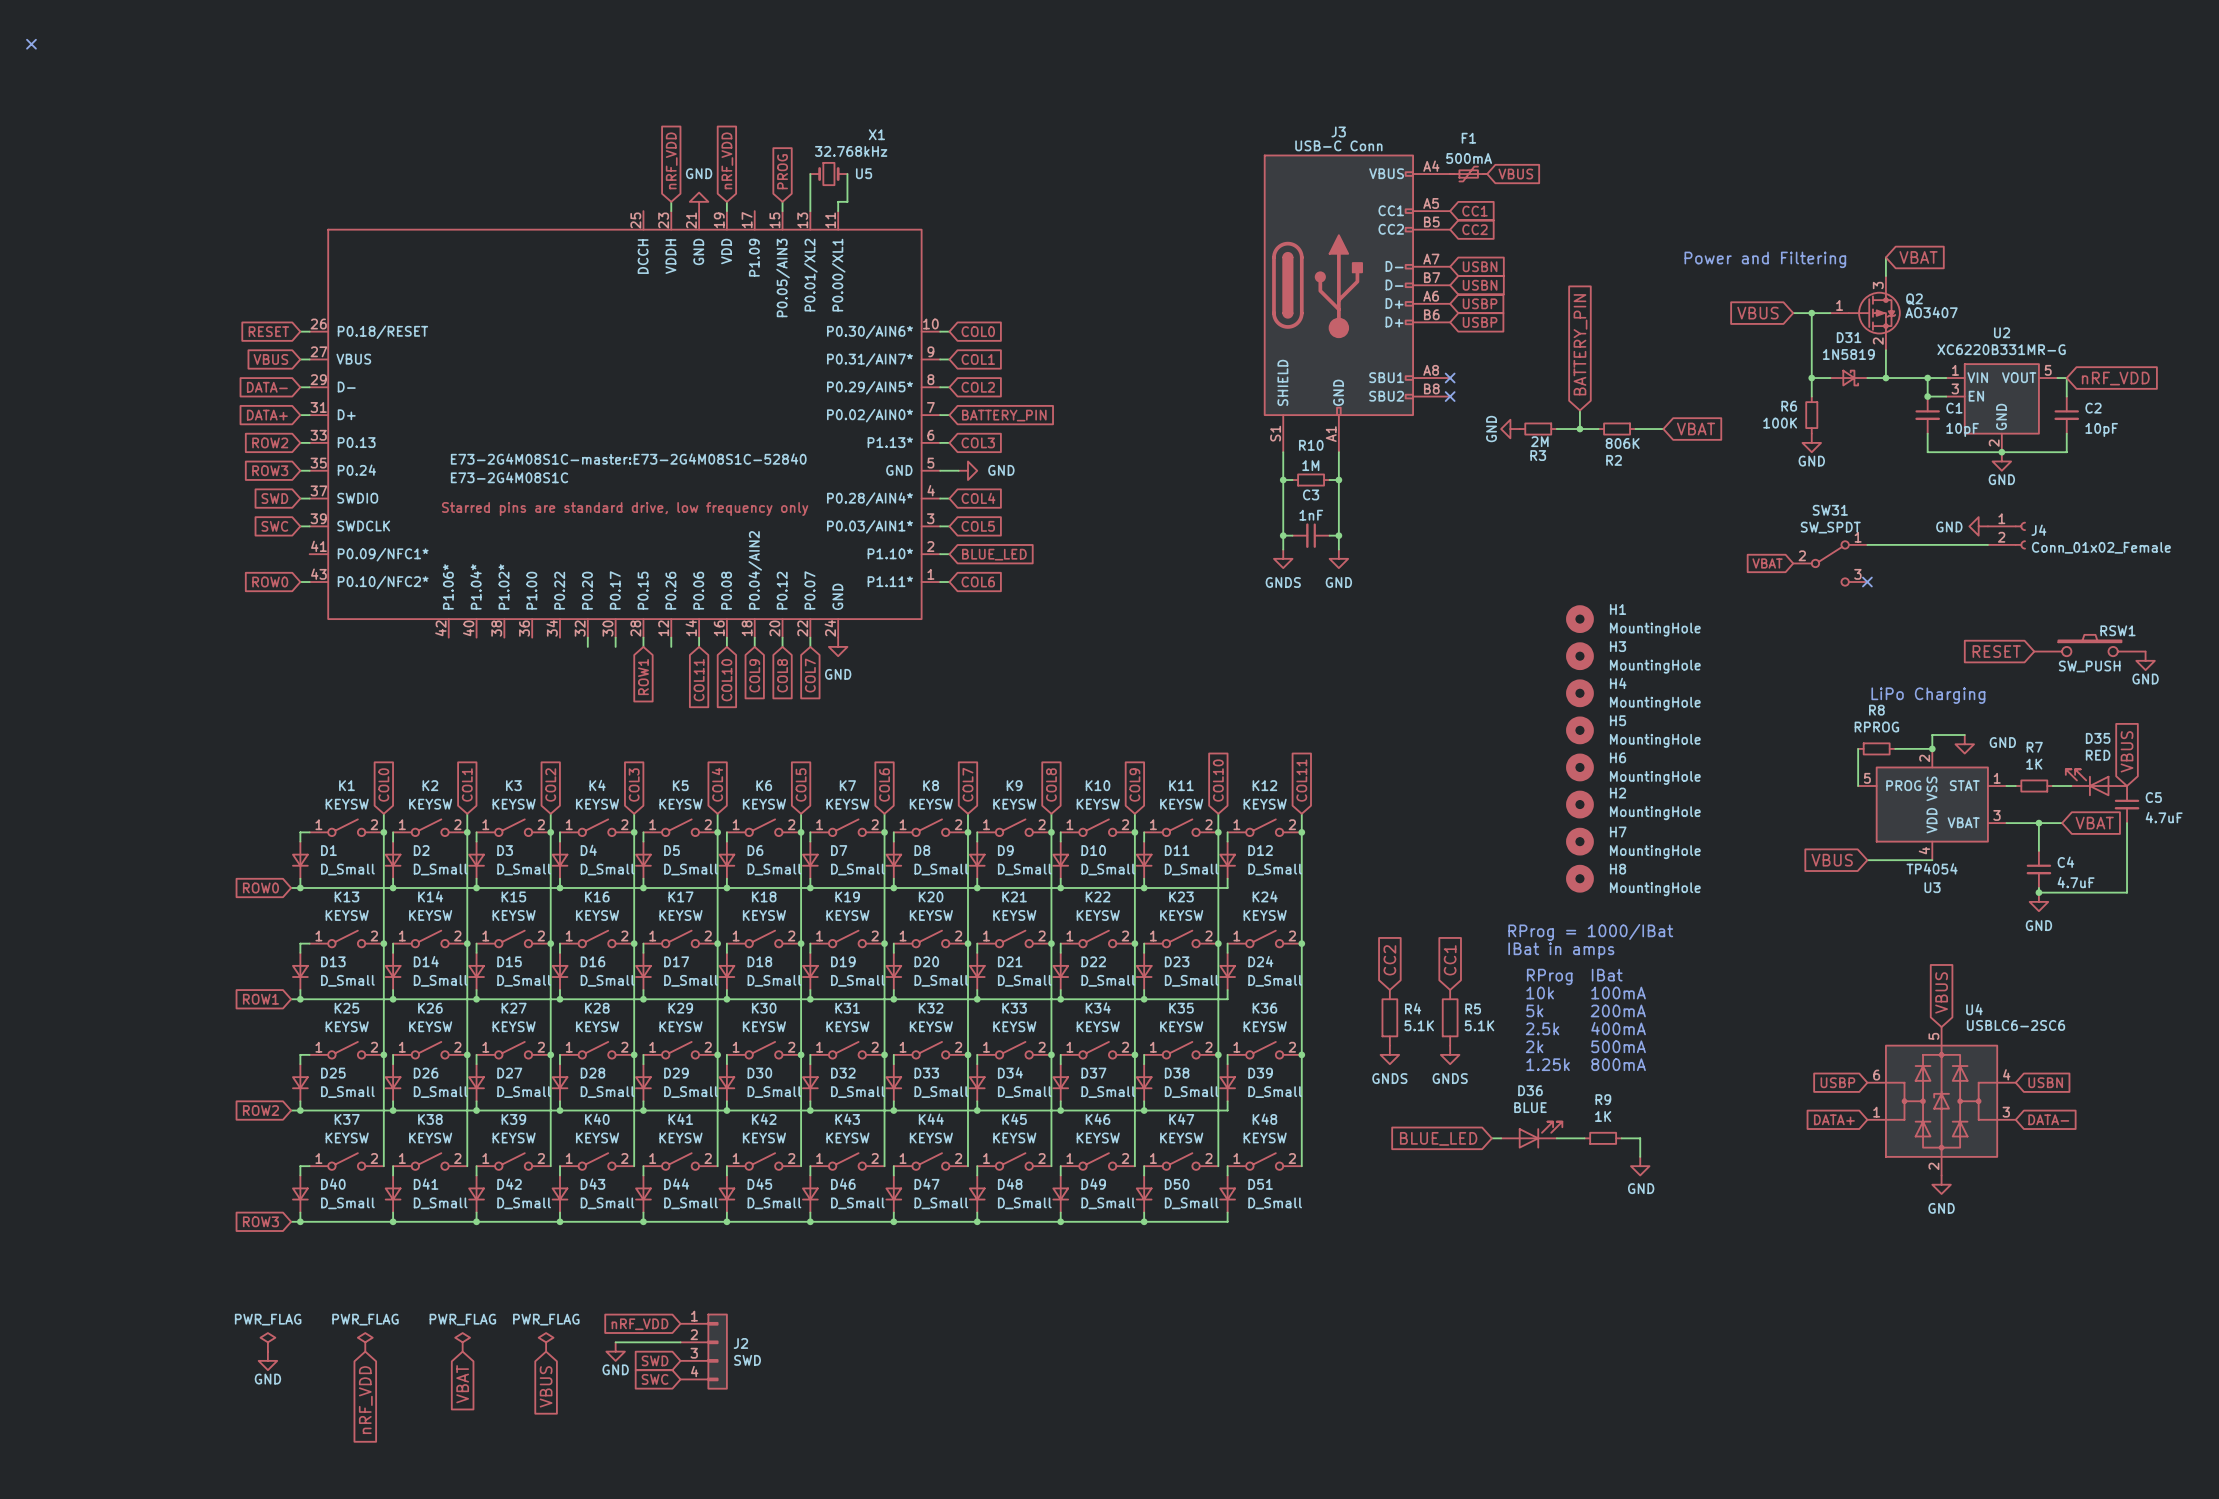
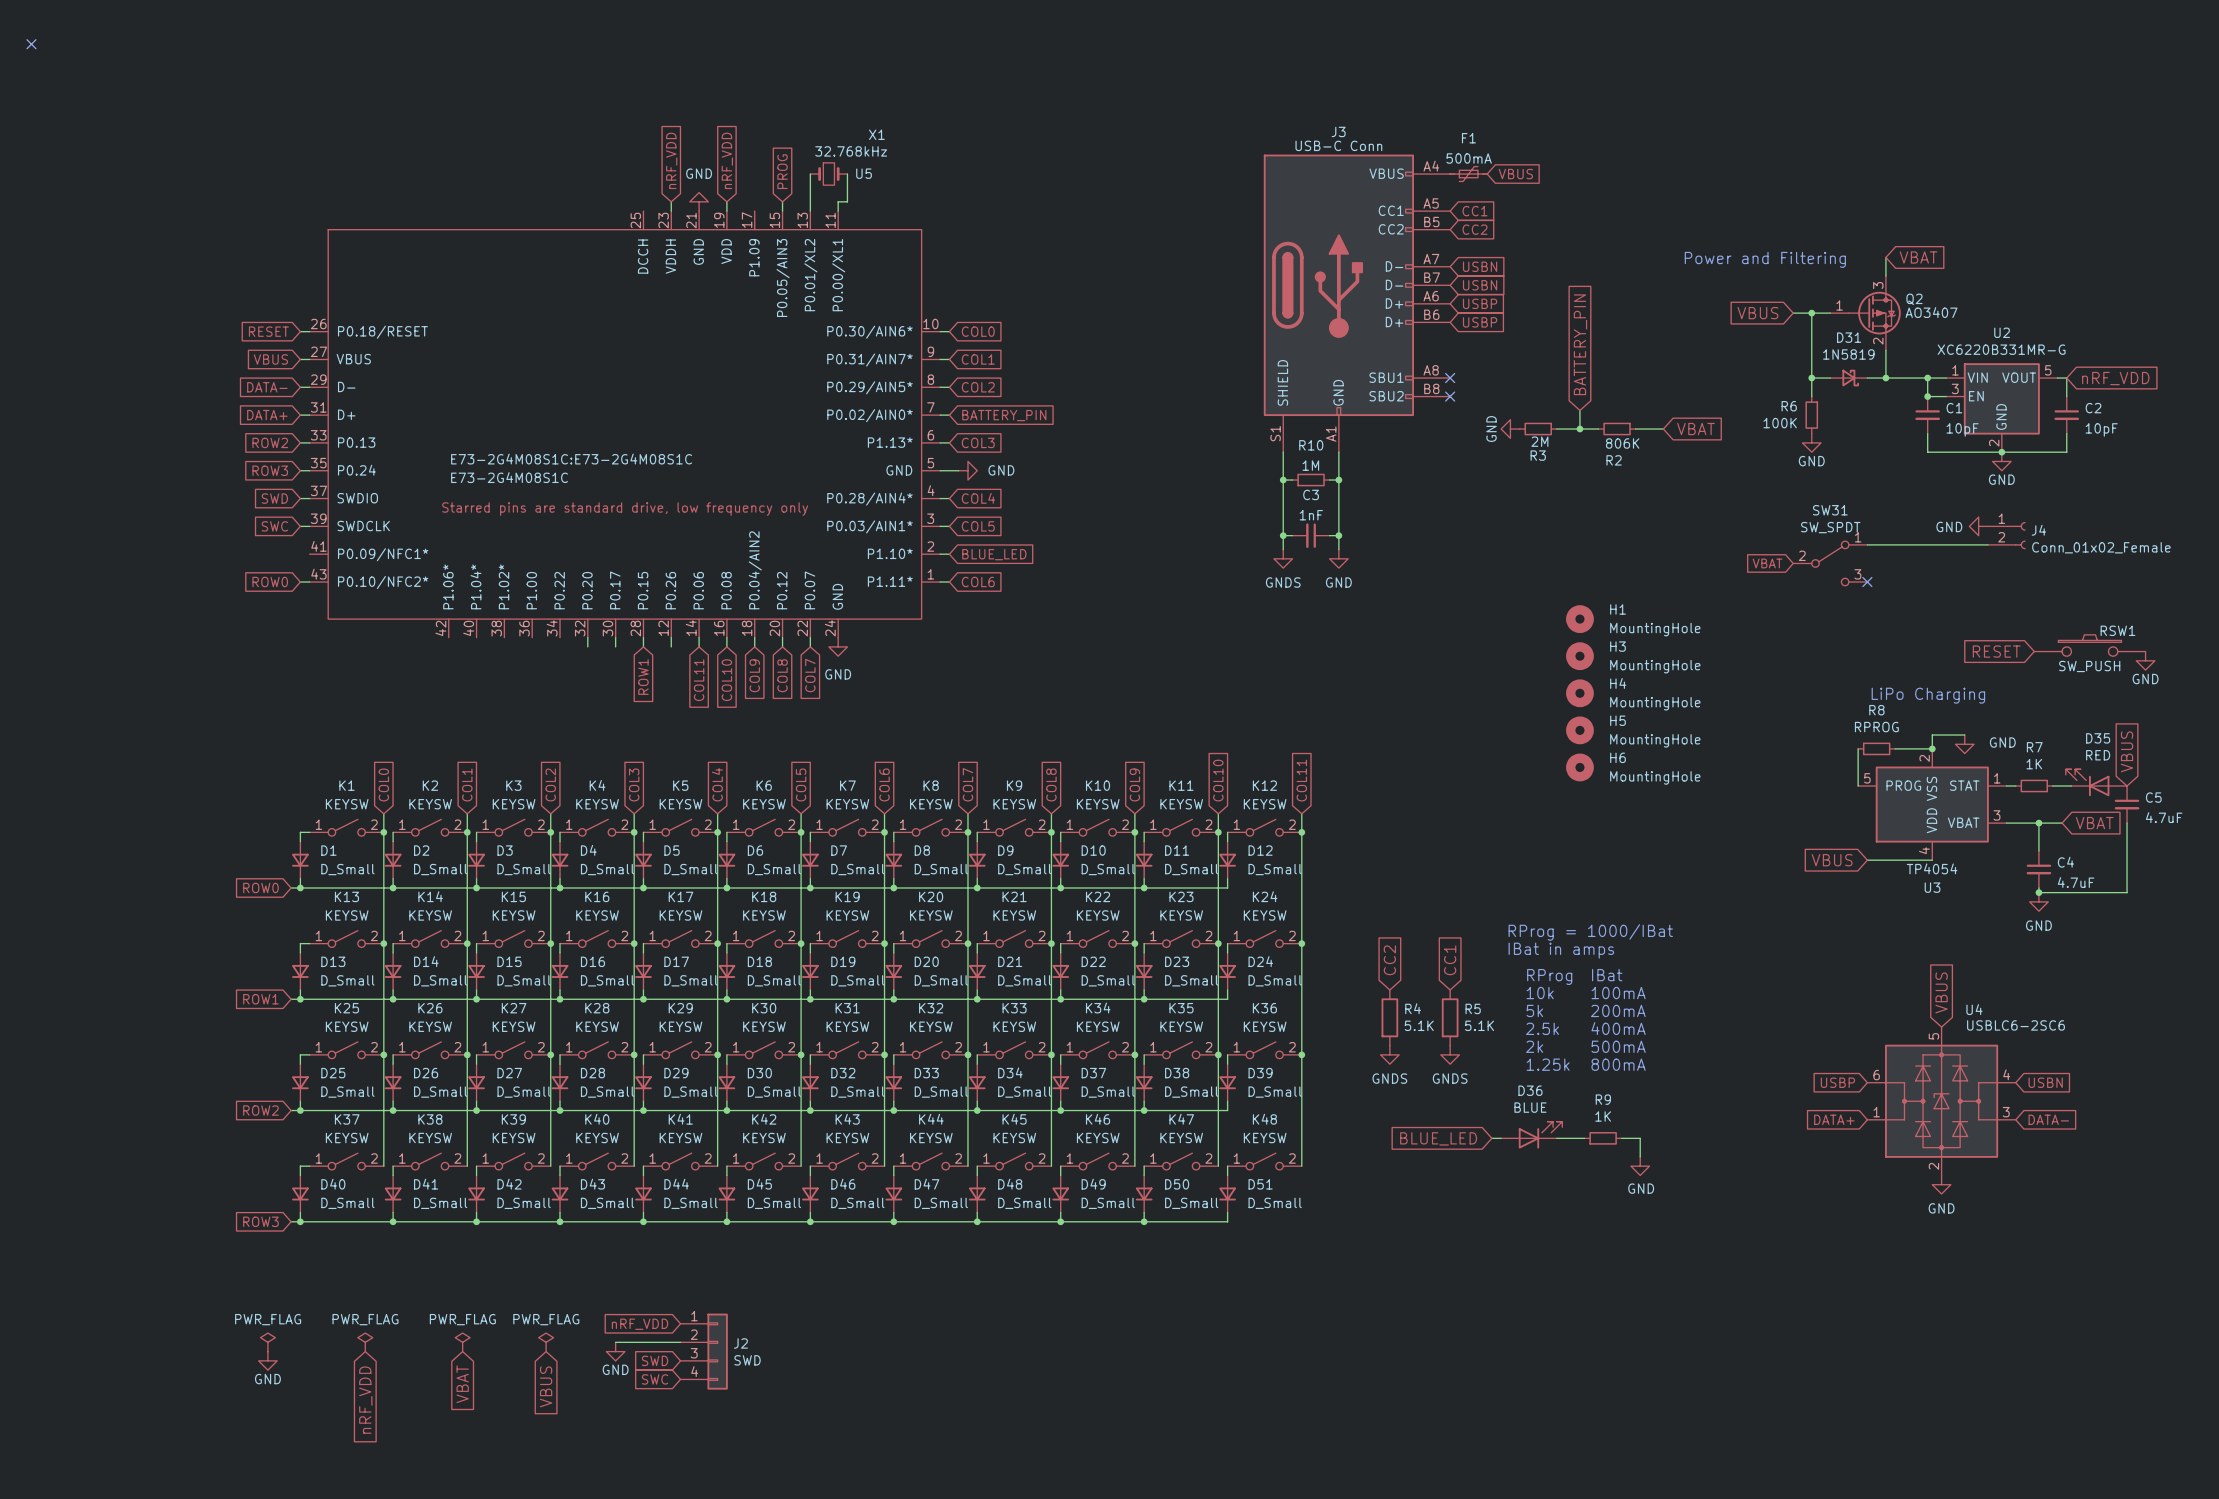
U5 text: E73-2G4M08S1C-master:E73-2G4M08S1C-52840 (628, 459) -> E73-2G4M08S1C:E73-2G4M08S1C (571, 459)
H2: MountingHole (1579, 804) -> none
H7: MountingHole (1579, 841) -> none
H8: MountingHole (1579, 878) -> none

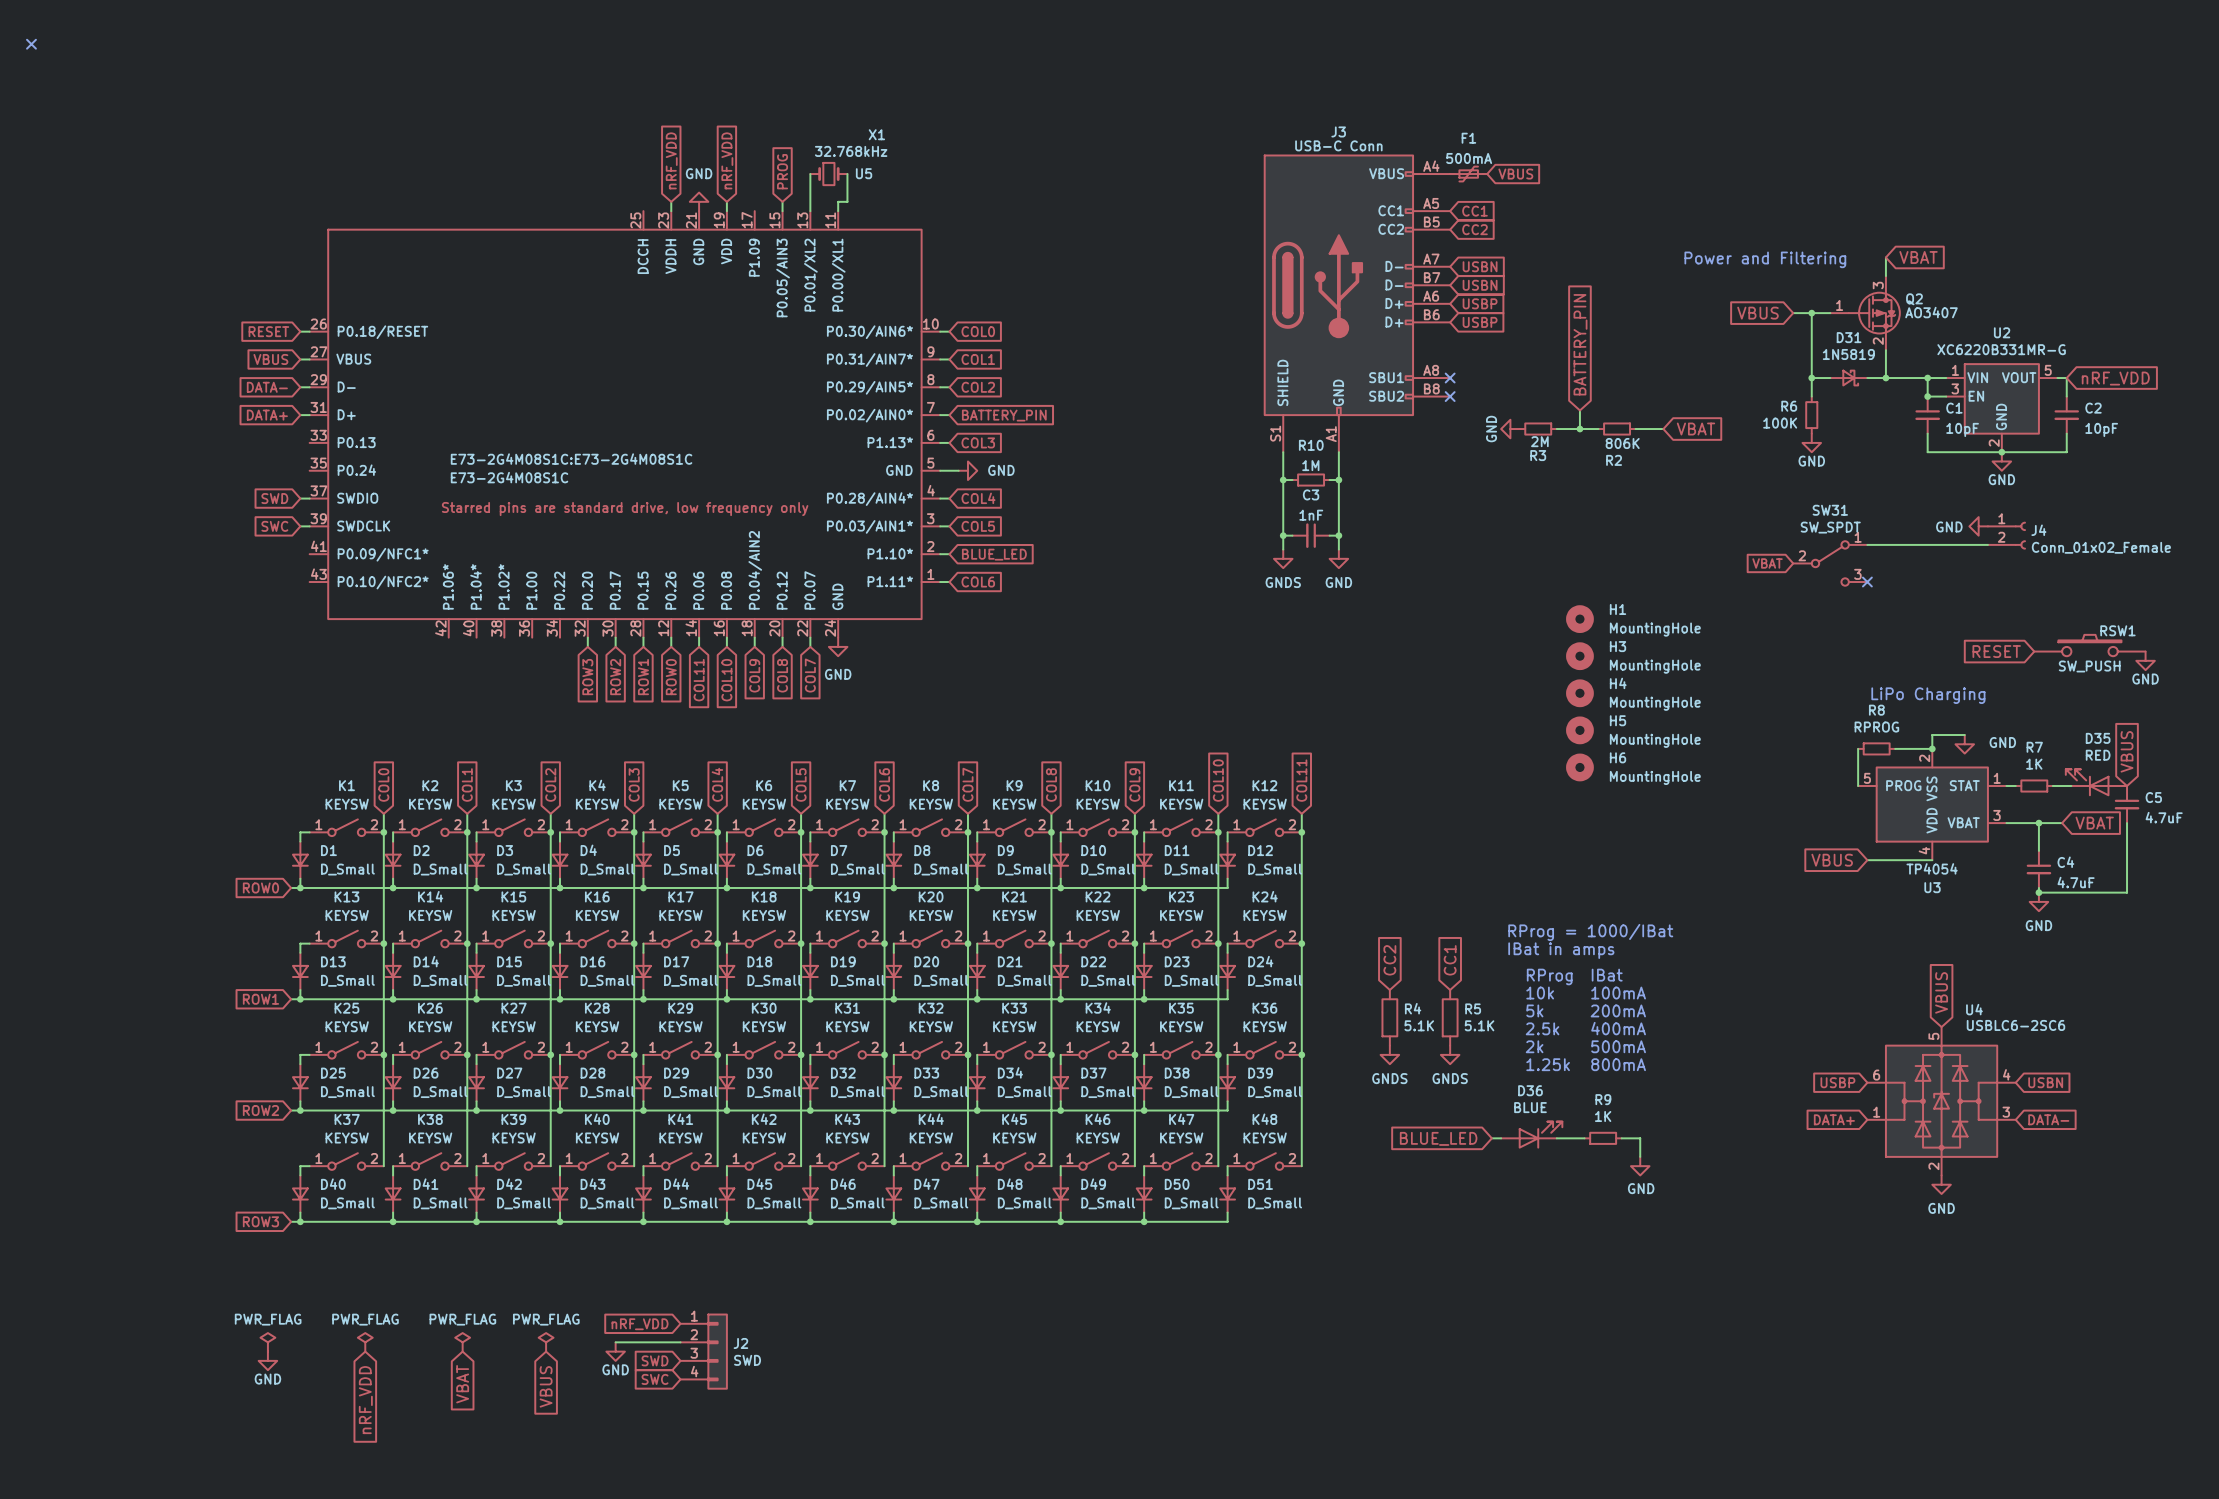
global label: ROW2 (270, 442) -> none
wire: (300, 442) (309, 442) -> none
global label: ROW3 (270, 470) -> none
wire: (300, 470) (309, 470) -> none
global label: ROW0 (270, 582) -> none
wire: (300, 582) (309, 582) -> none
global label: none -> ROW3 (587, 677)
global label: none -> ROW2 (615, 677)
global label: none -> ROW0 (671, 677)

